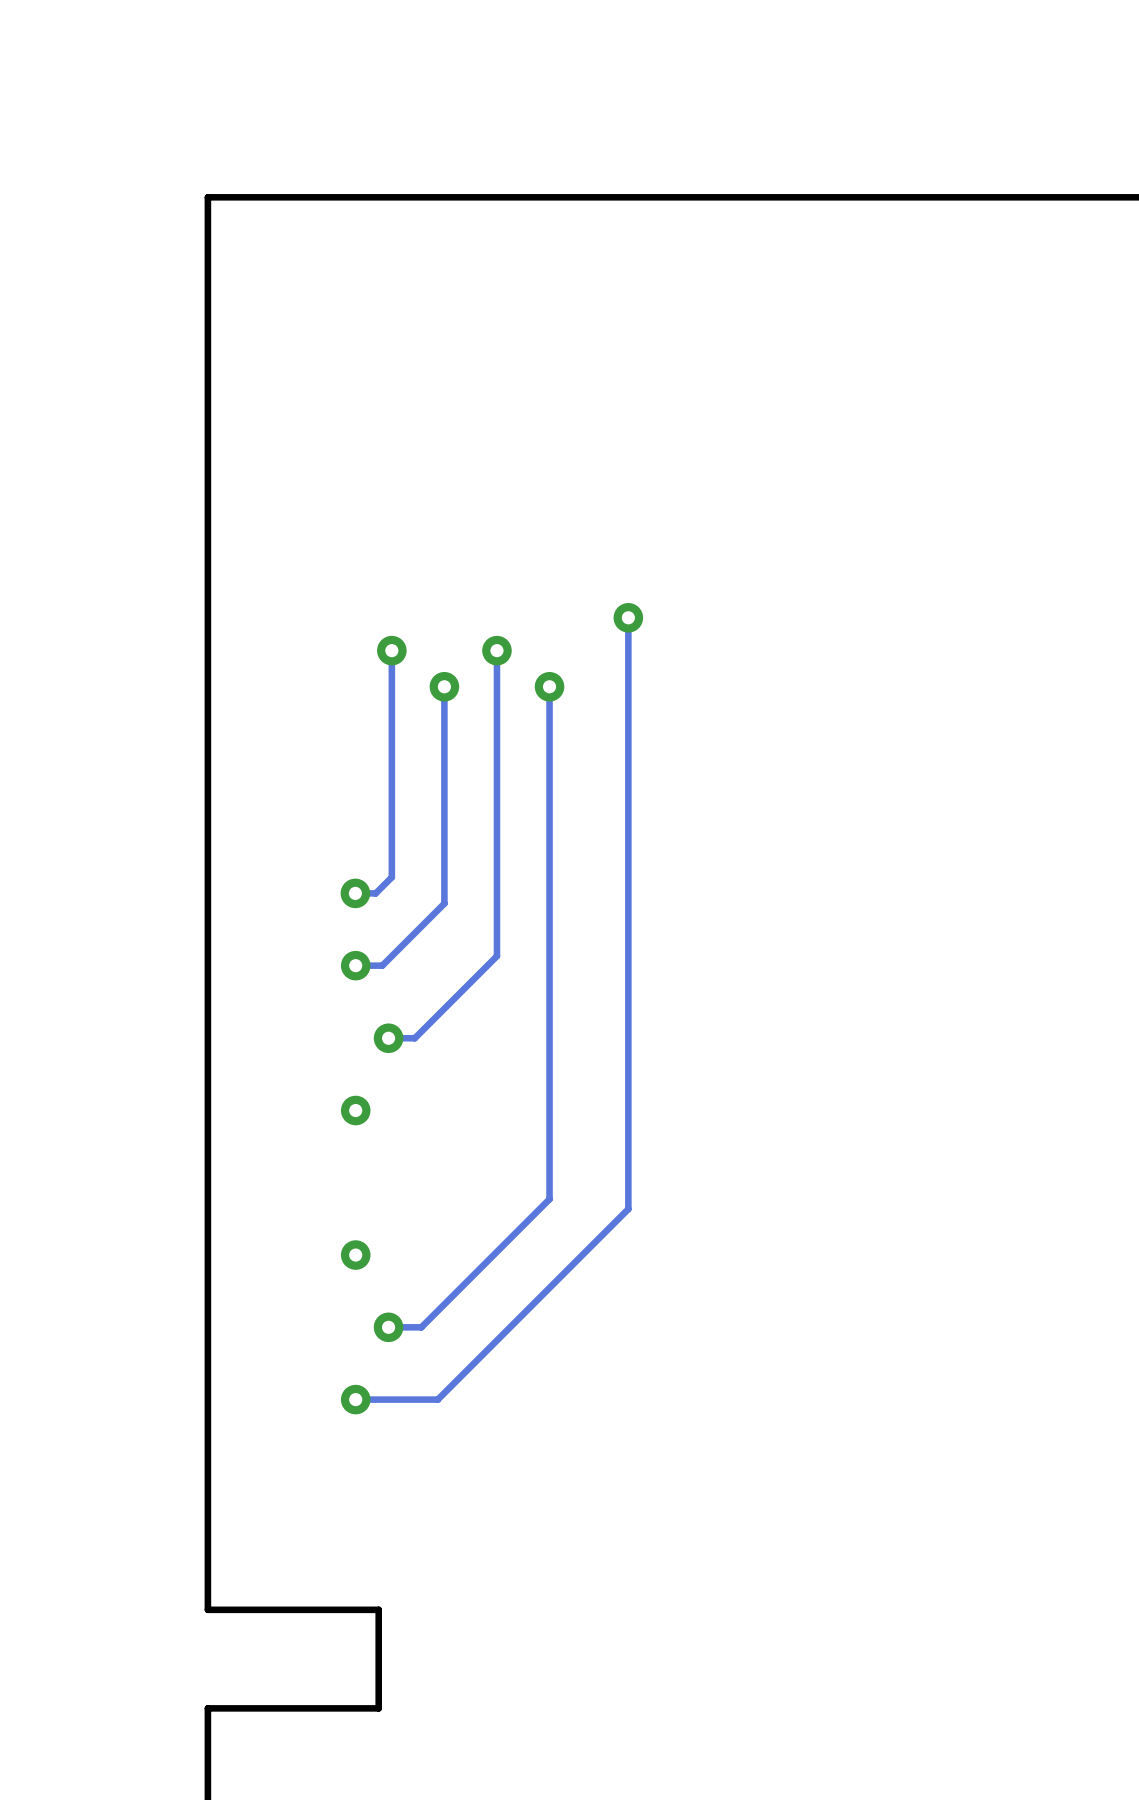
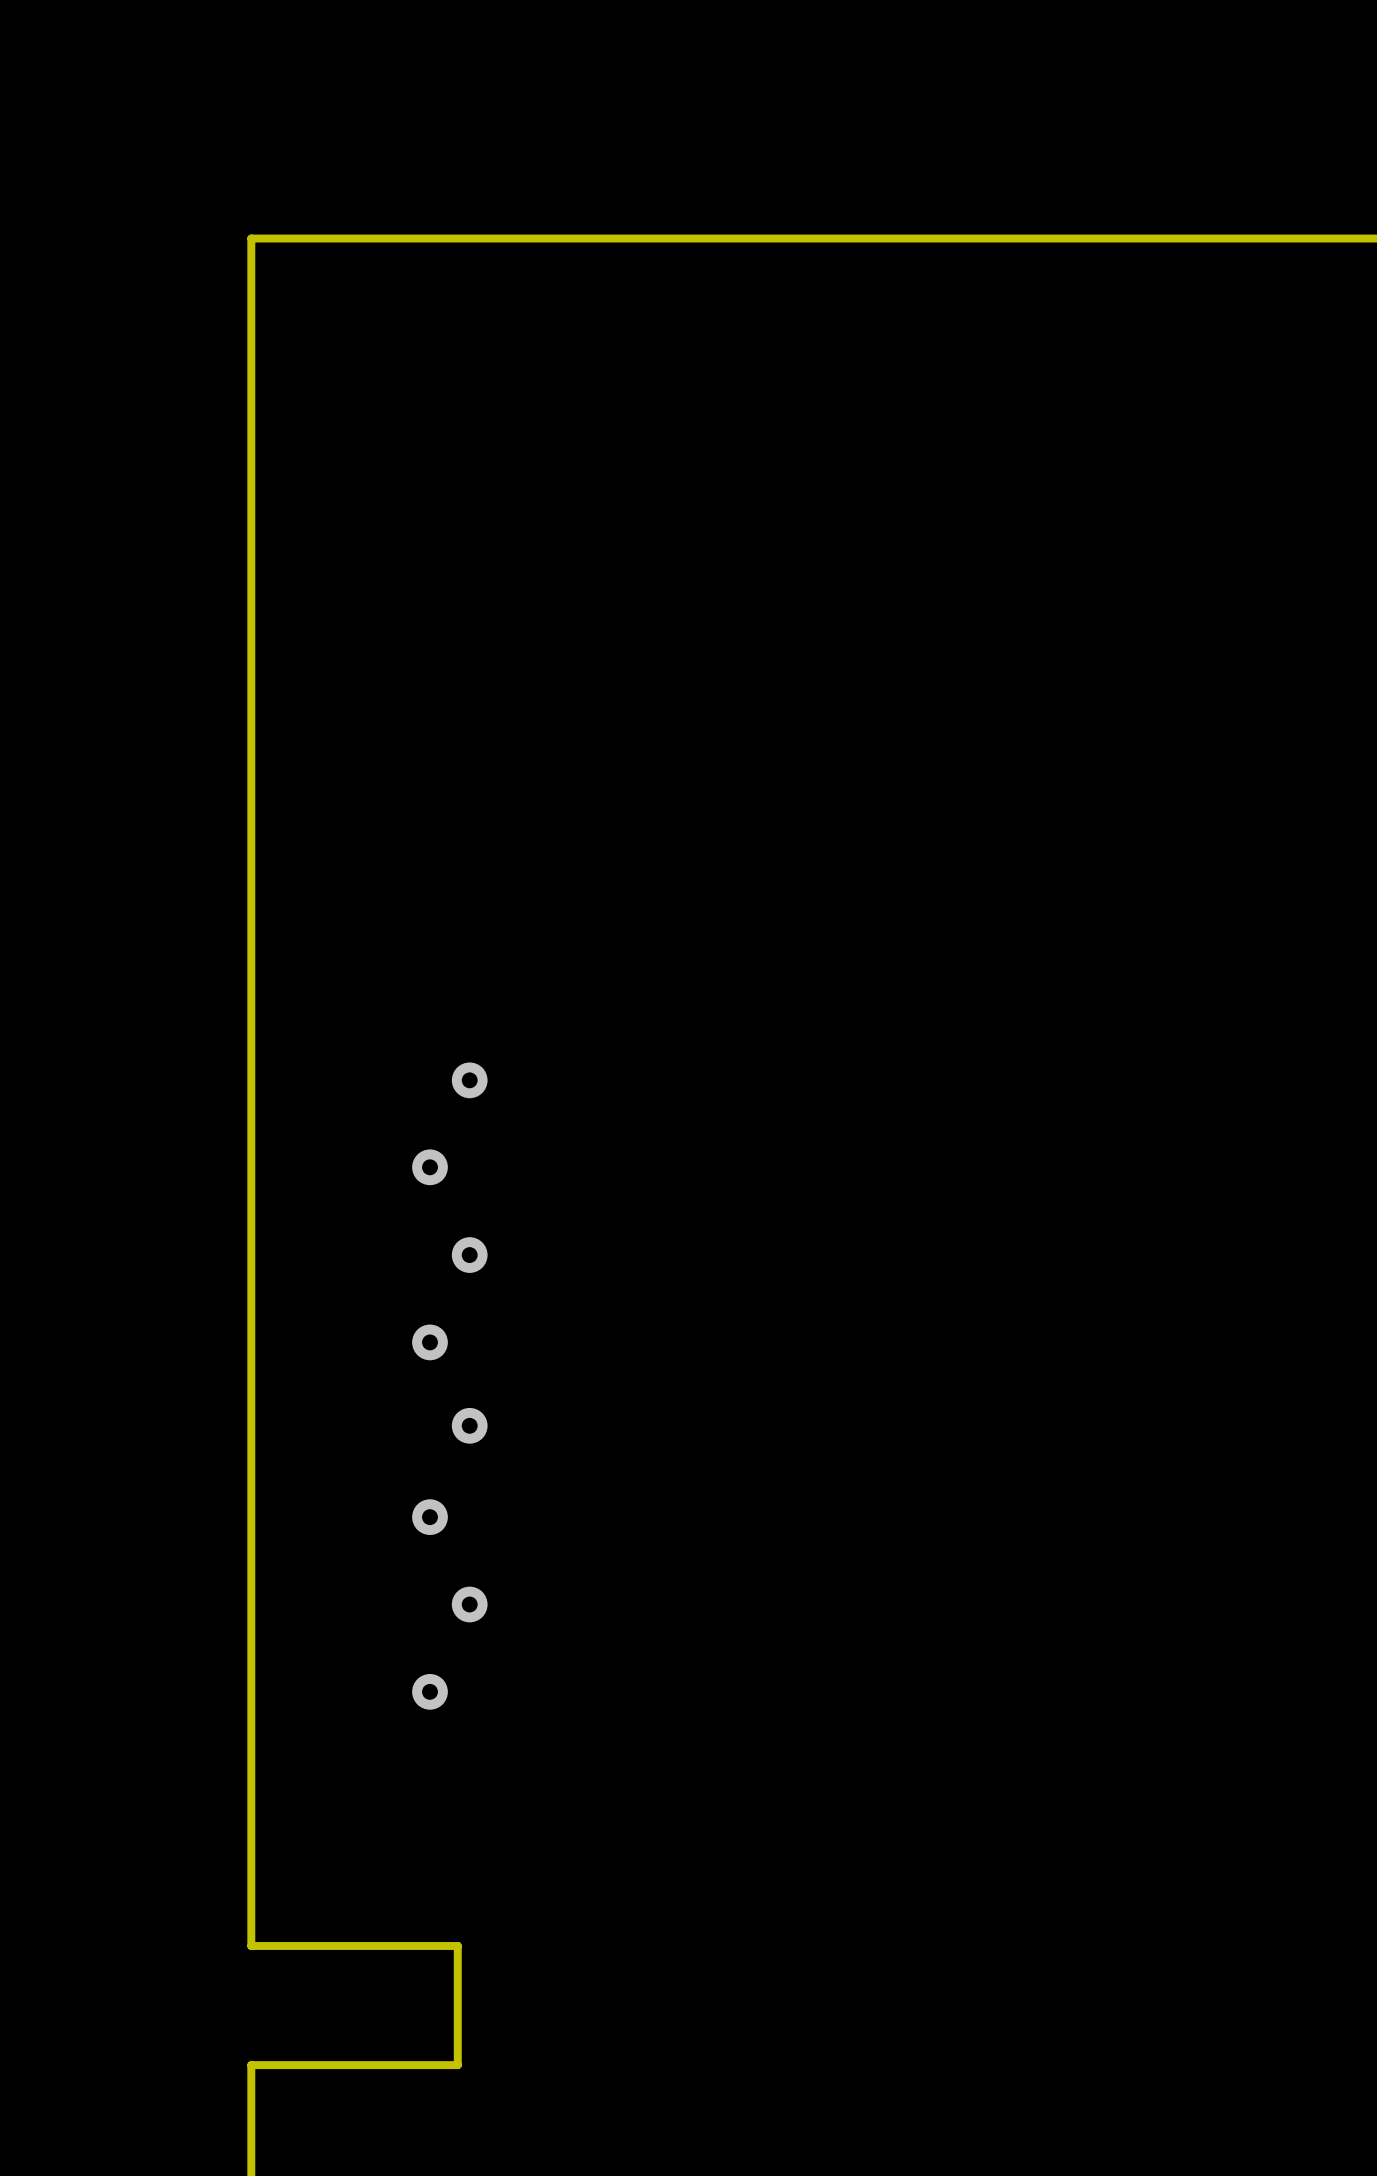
track: (628, 617) (628, 1209) (437, 1399) (355, 1399) -> none
via: (628, 617) -> none
track: (391, 650) (391, 877) (375, 893) (355, 893) -> none
via: (391, 650) -> none
track: (496, 650) (496, 956) (414, 1038) (388, 1038) -> none
via: (496, 650) -> none
track: (444, 686) (444, 903) (382, 965) (355, 965) -> none
via: (444, 686) -> none
track: (549, 686) (549, 1199) (421, 1327) (388, 1327) -> none
via: (549, 686) -> none
via position: (355, 893) -> (469, 1080)
via: none -> (469, 1425)

